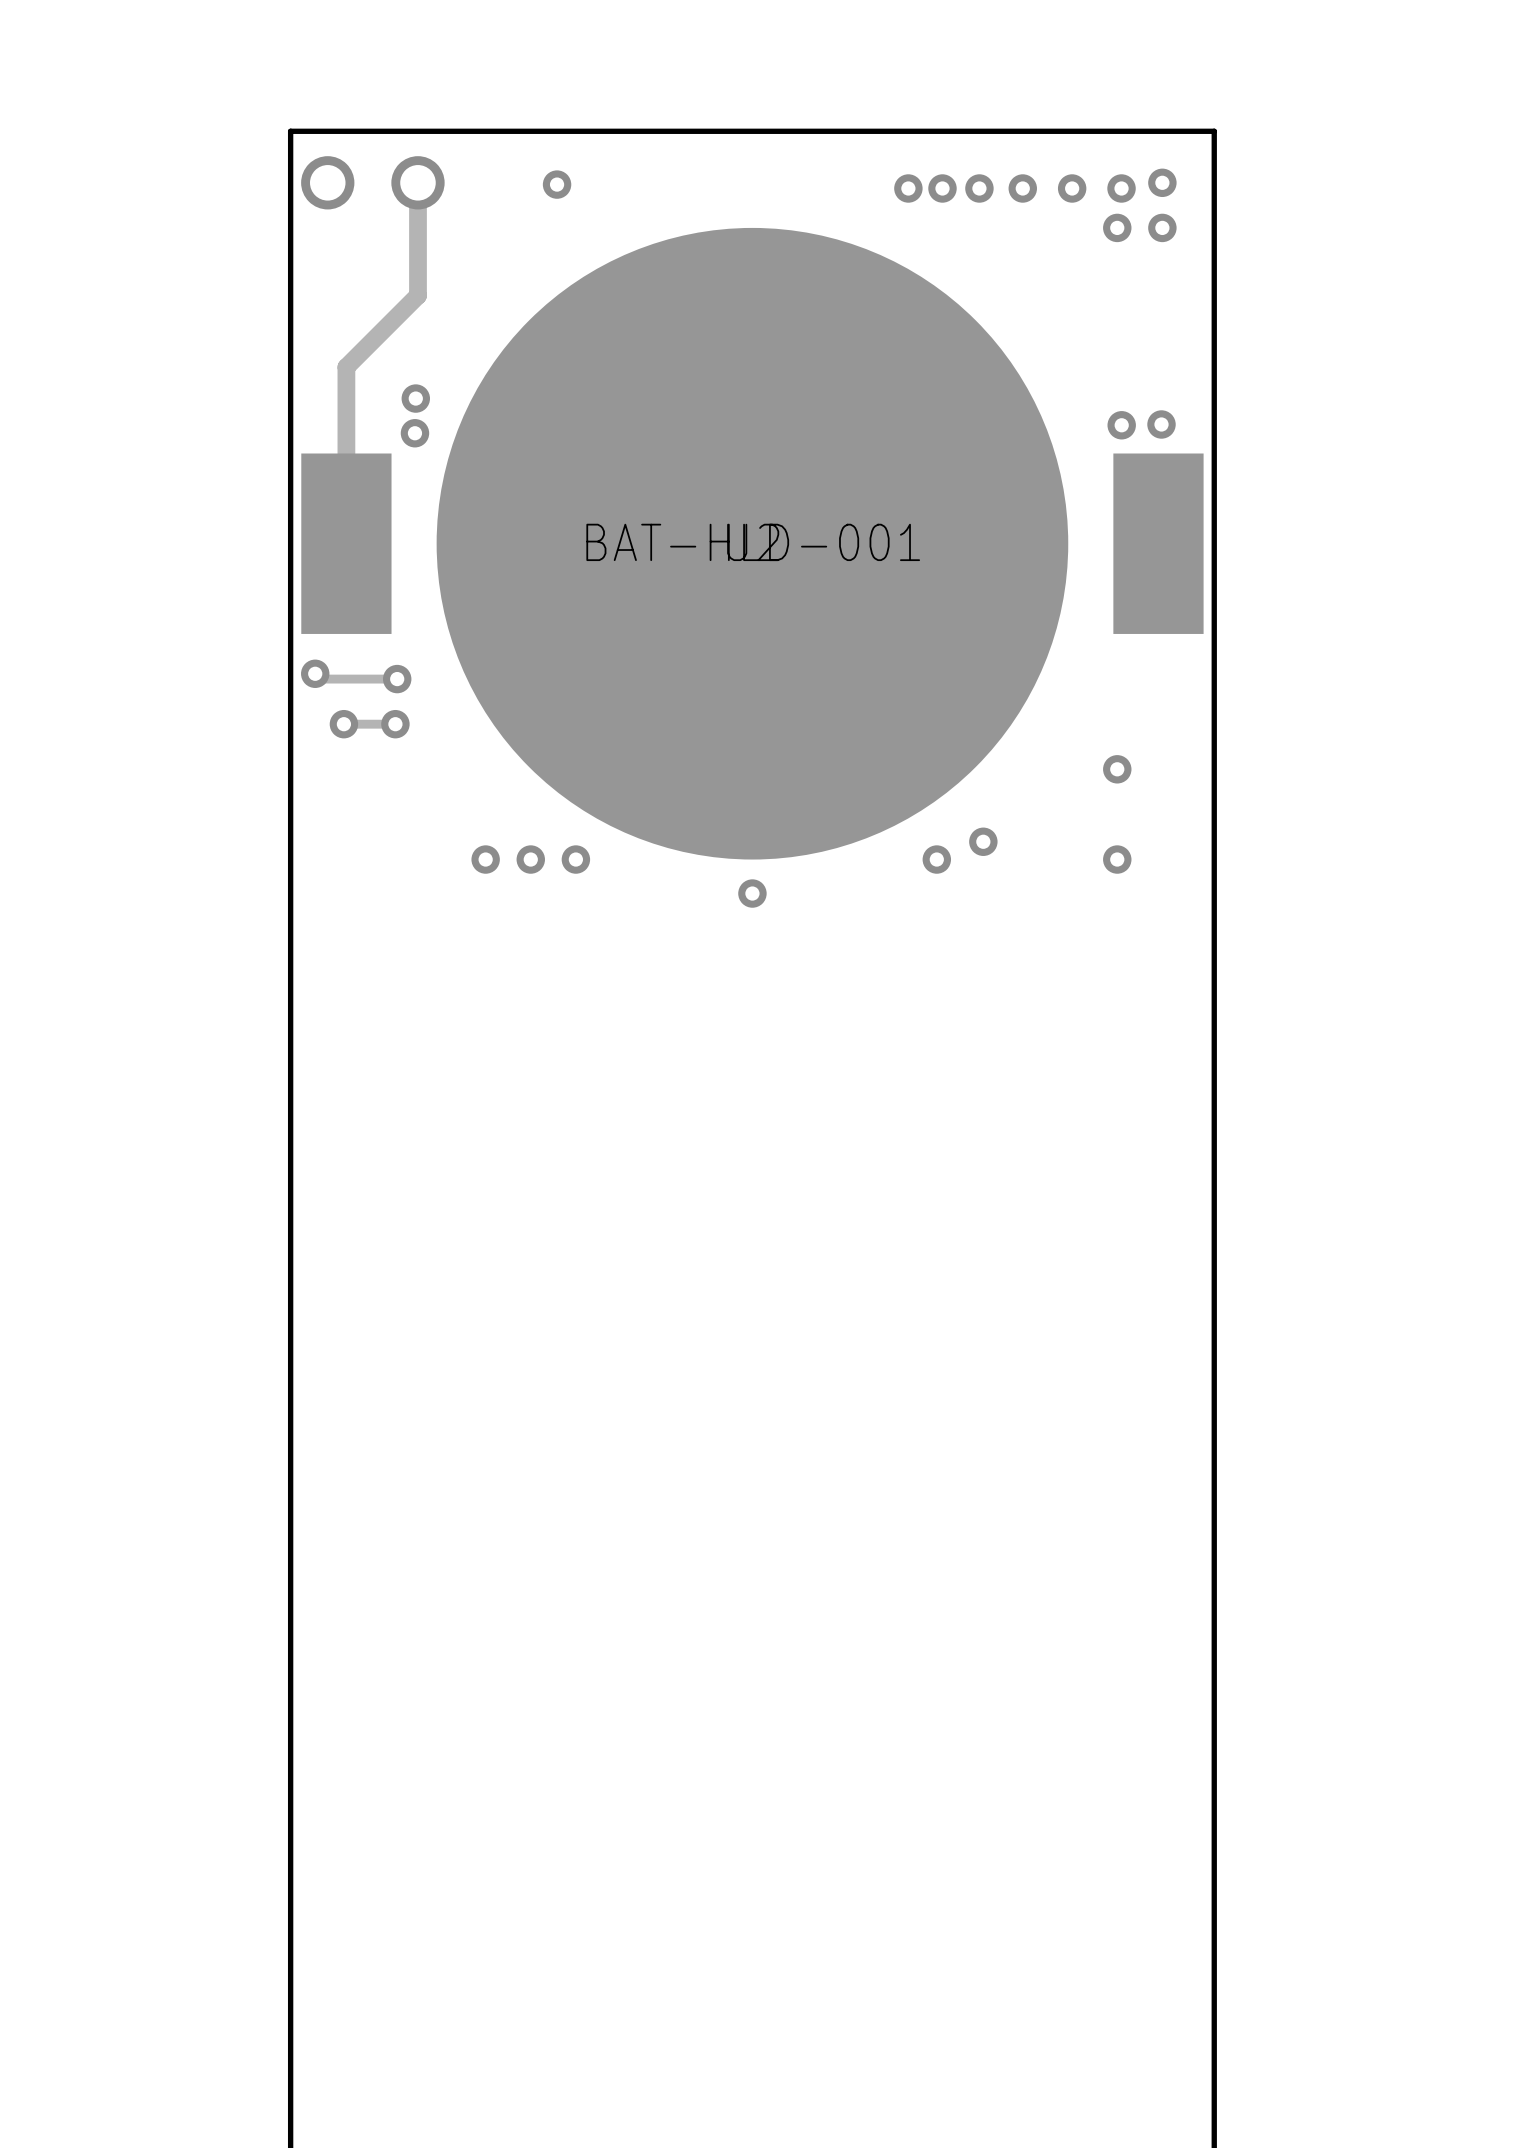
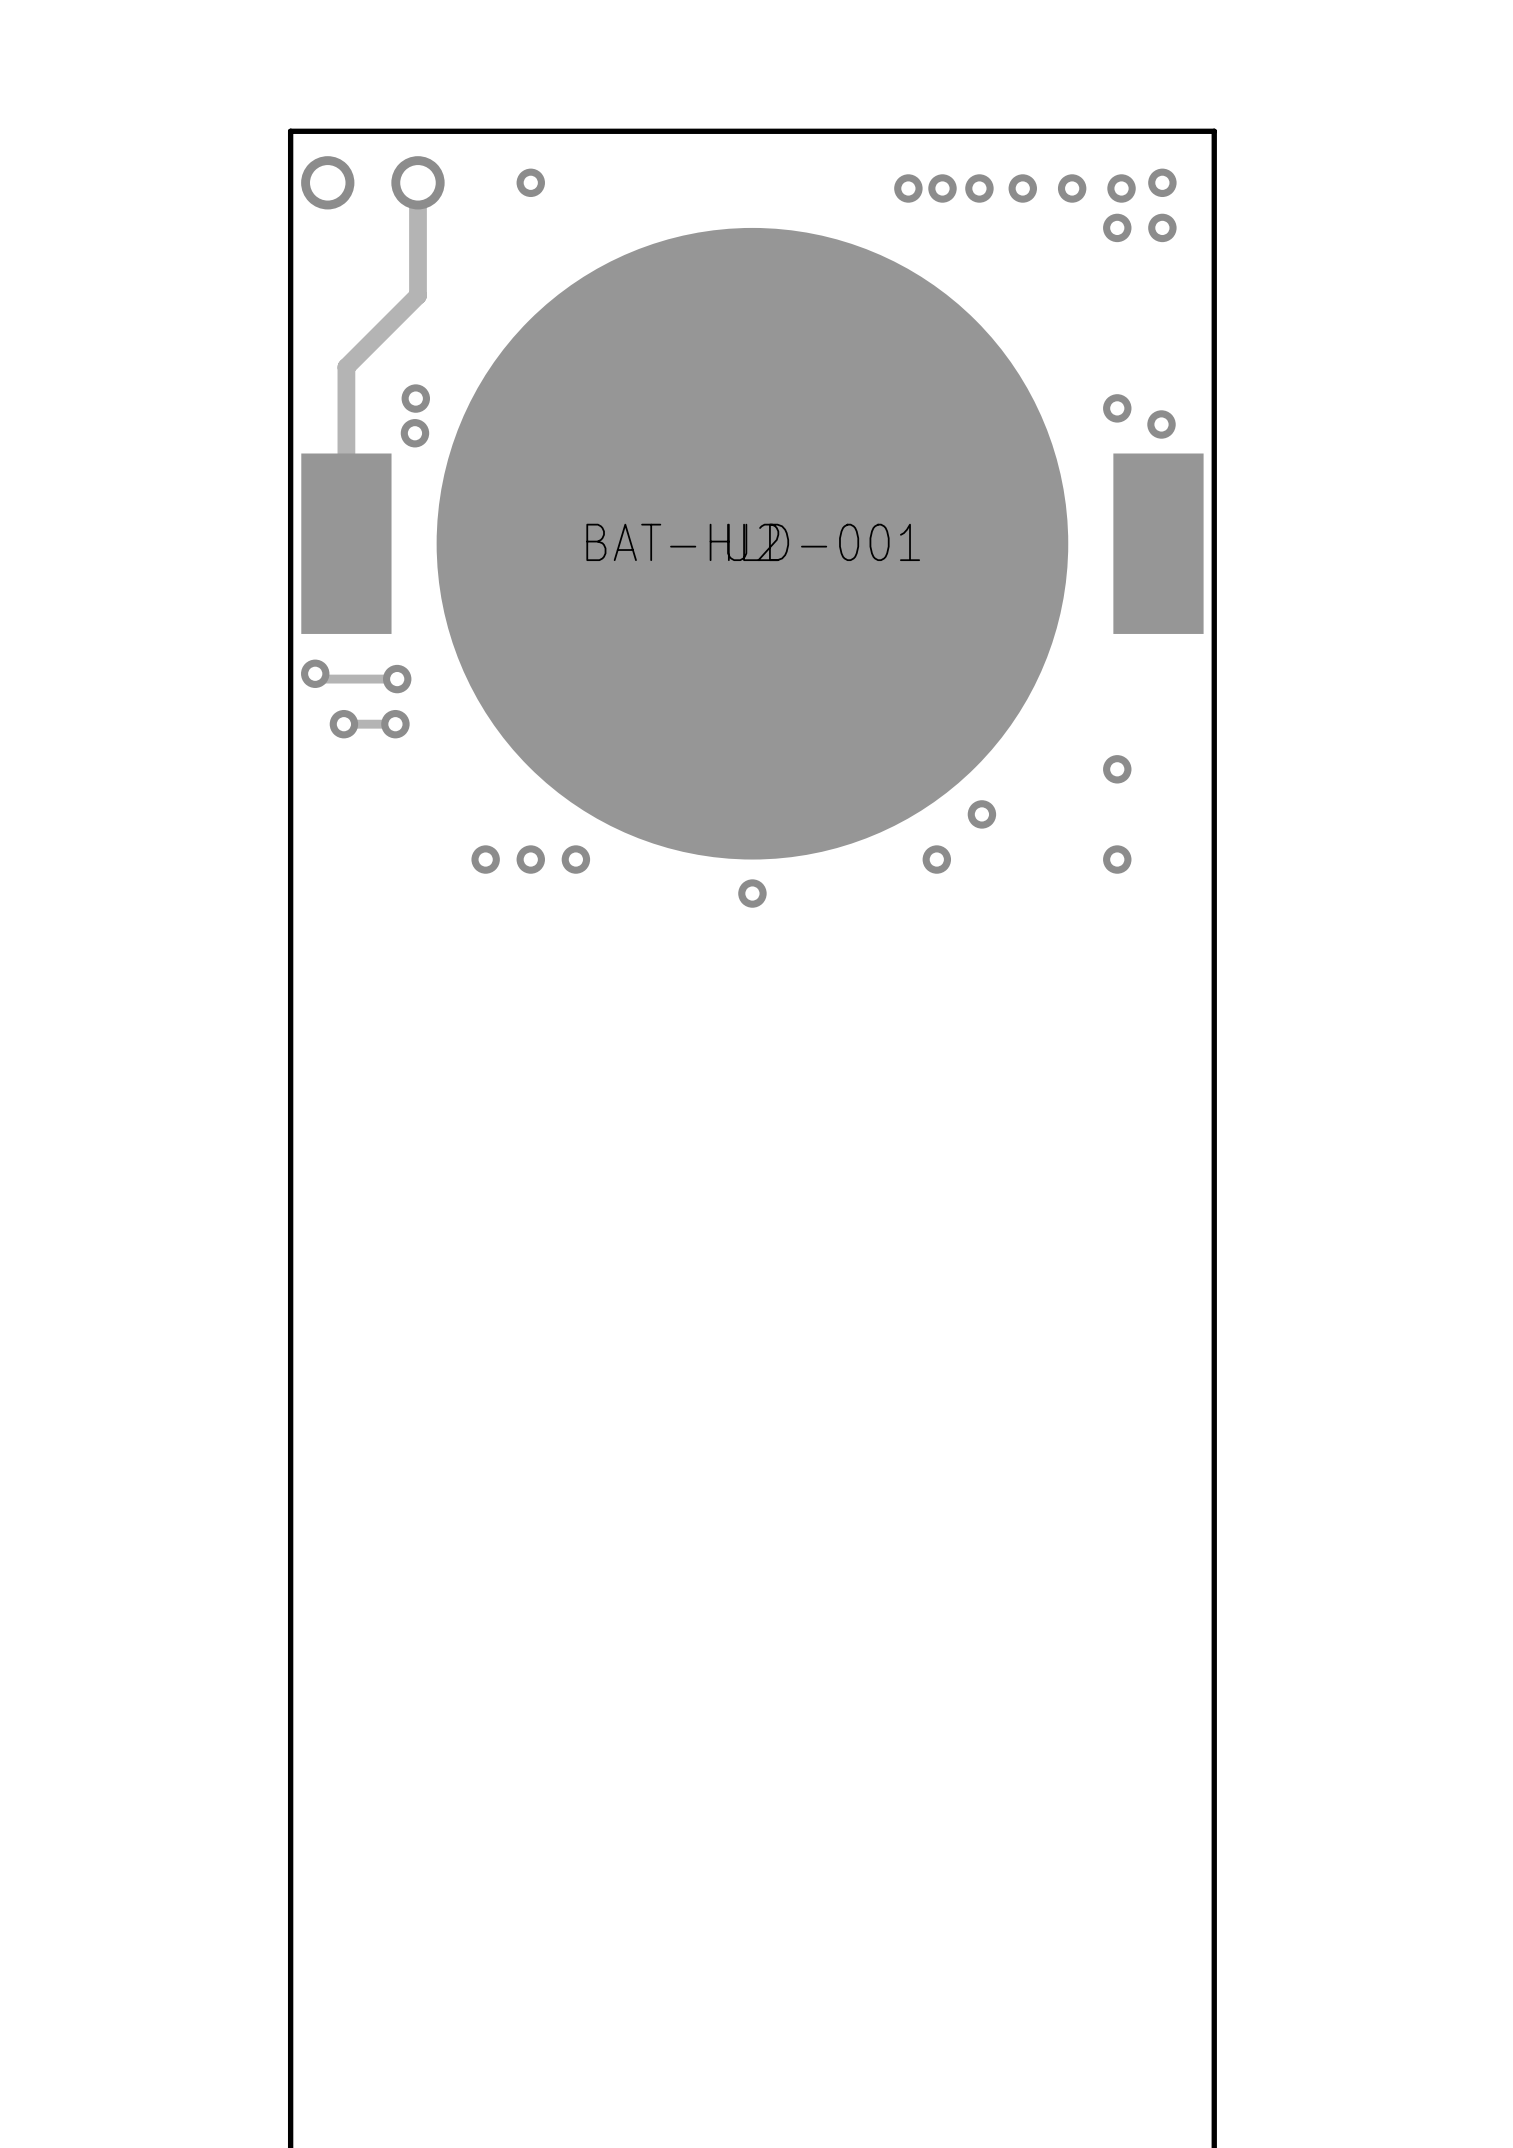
via position: (557, 184) -> (530, 182)
via position: (1121, 425) -> (1117, 408)
via position: (983, 841) -> (981, 814)

